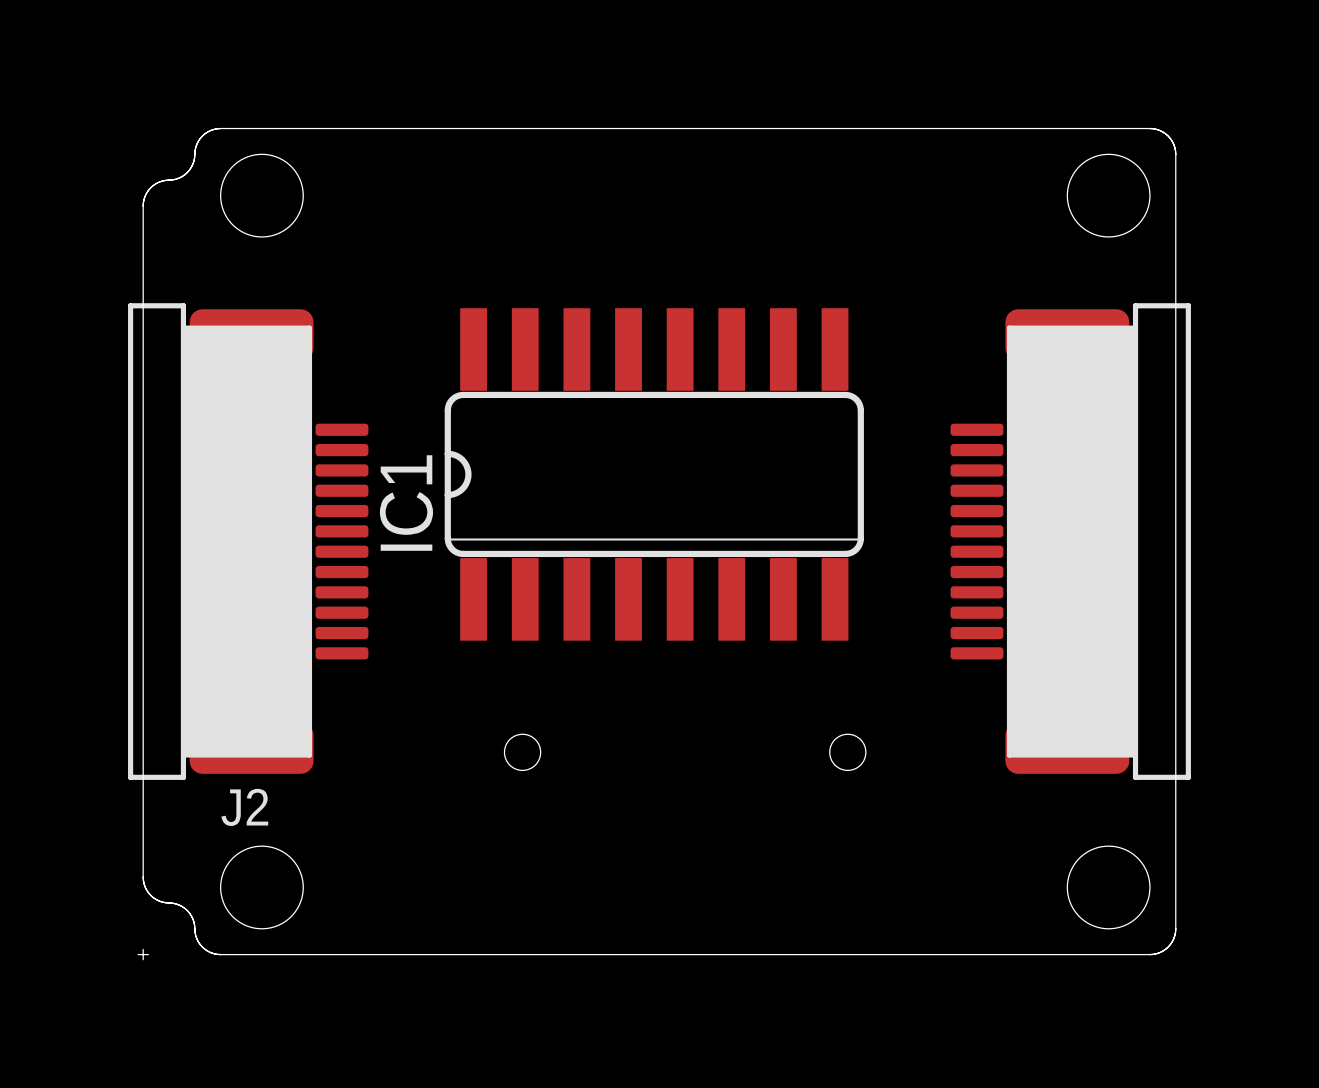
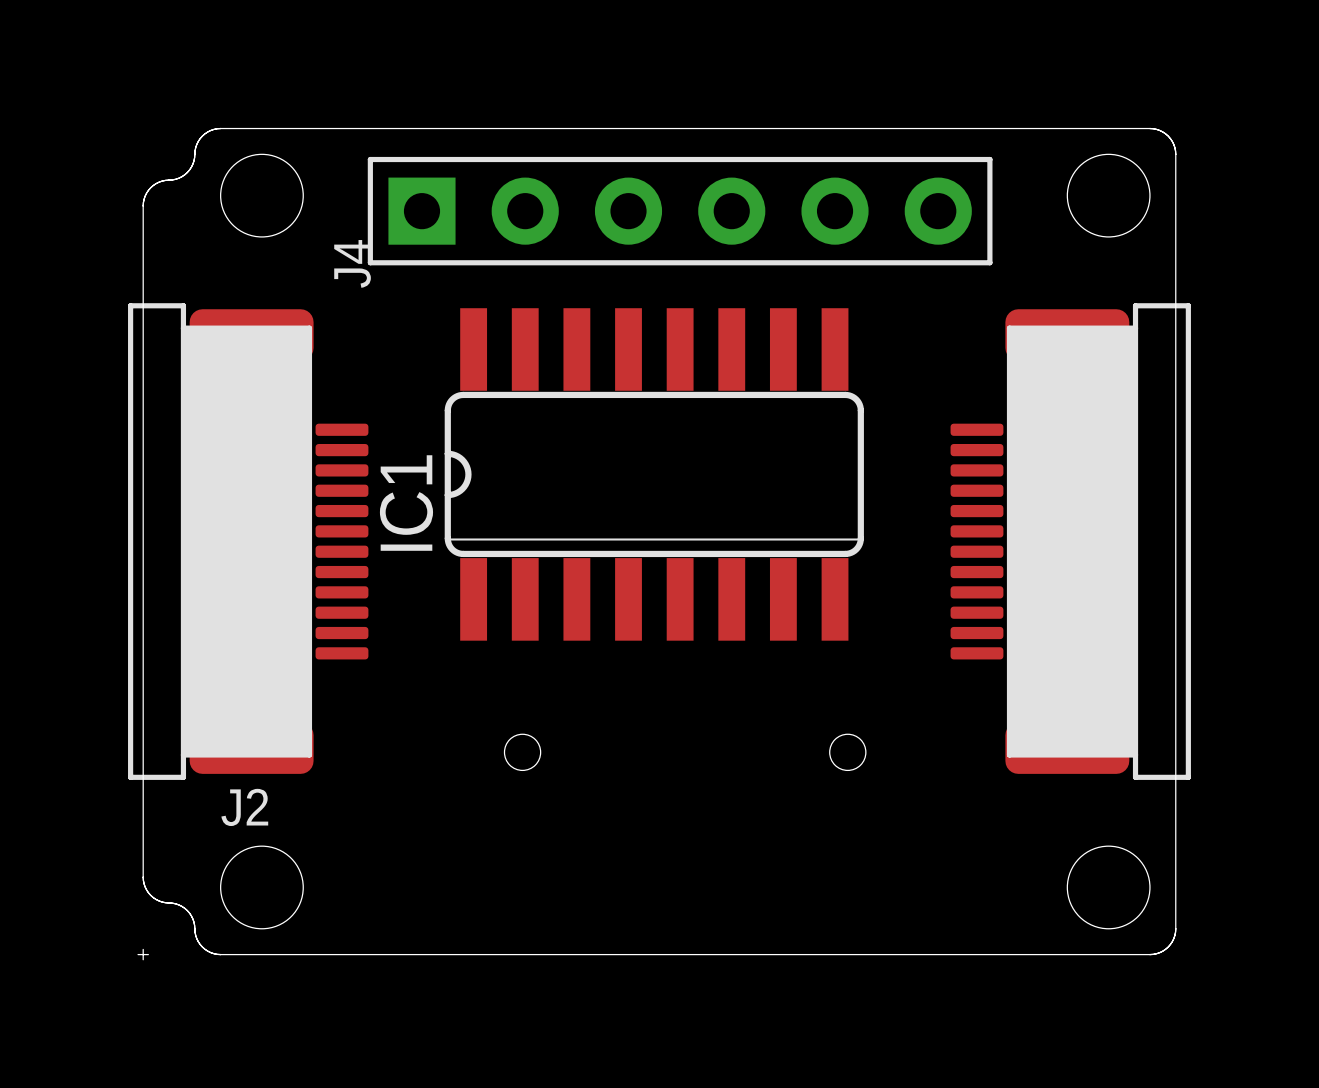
J4: none -> (680, 211)

